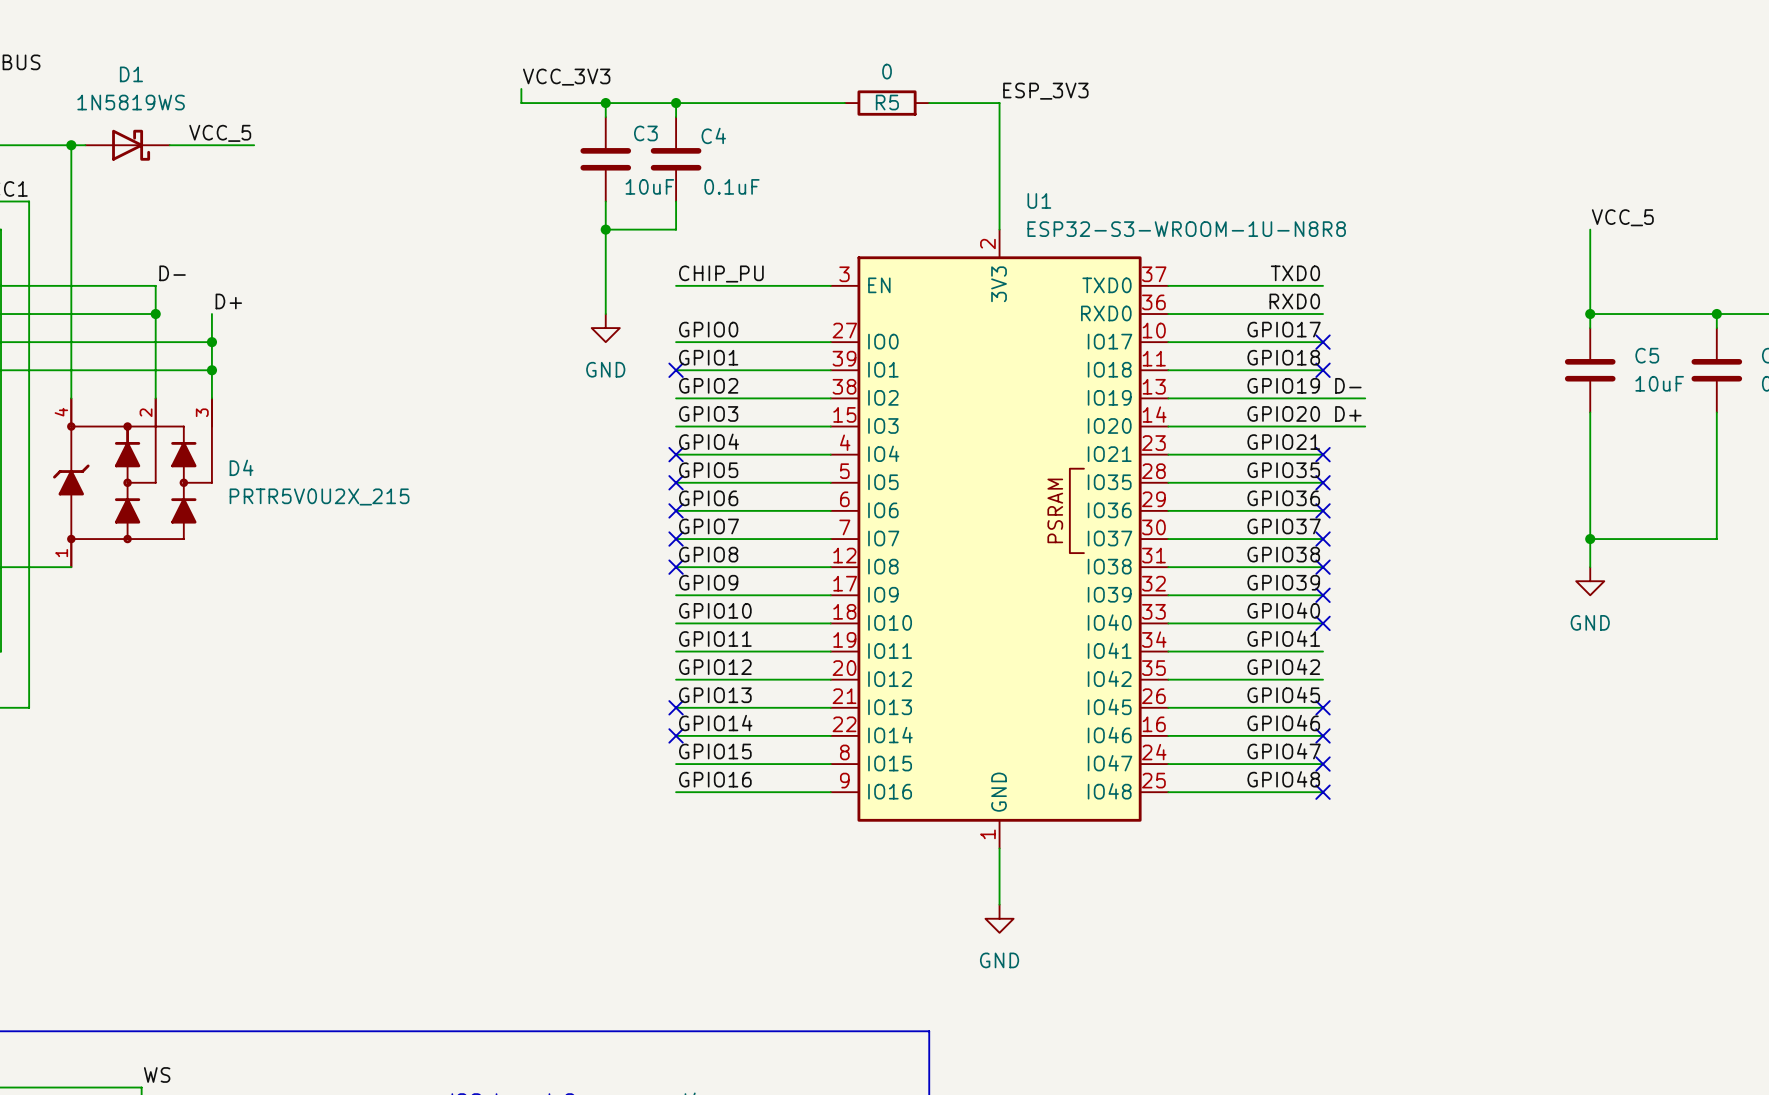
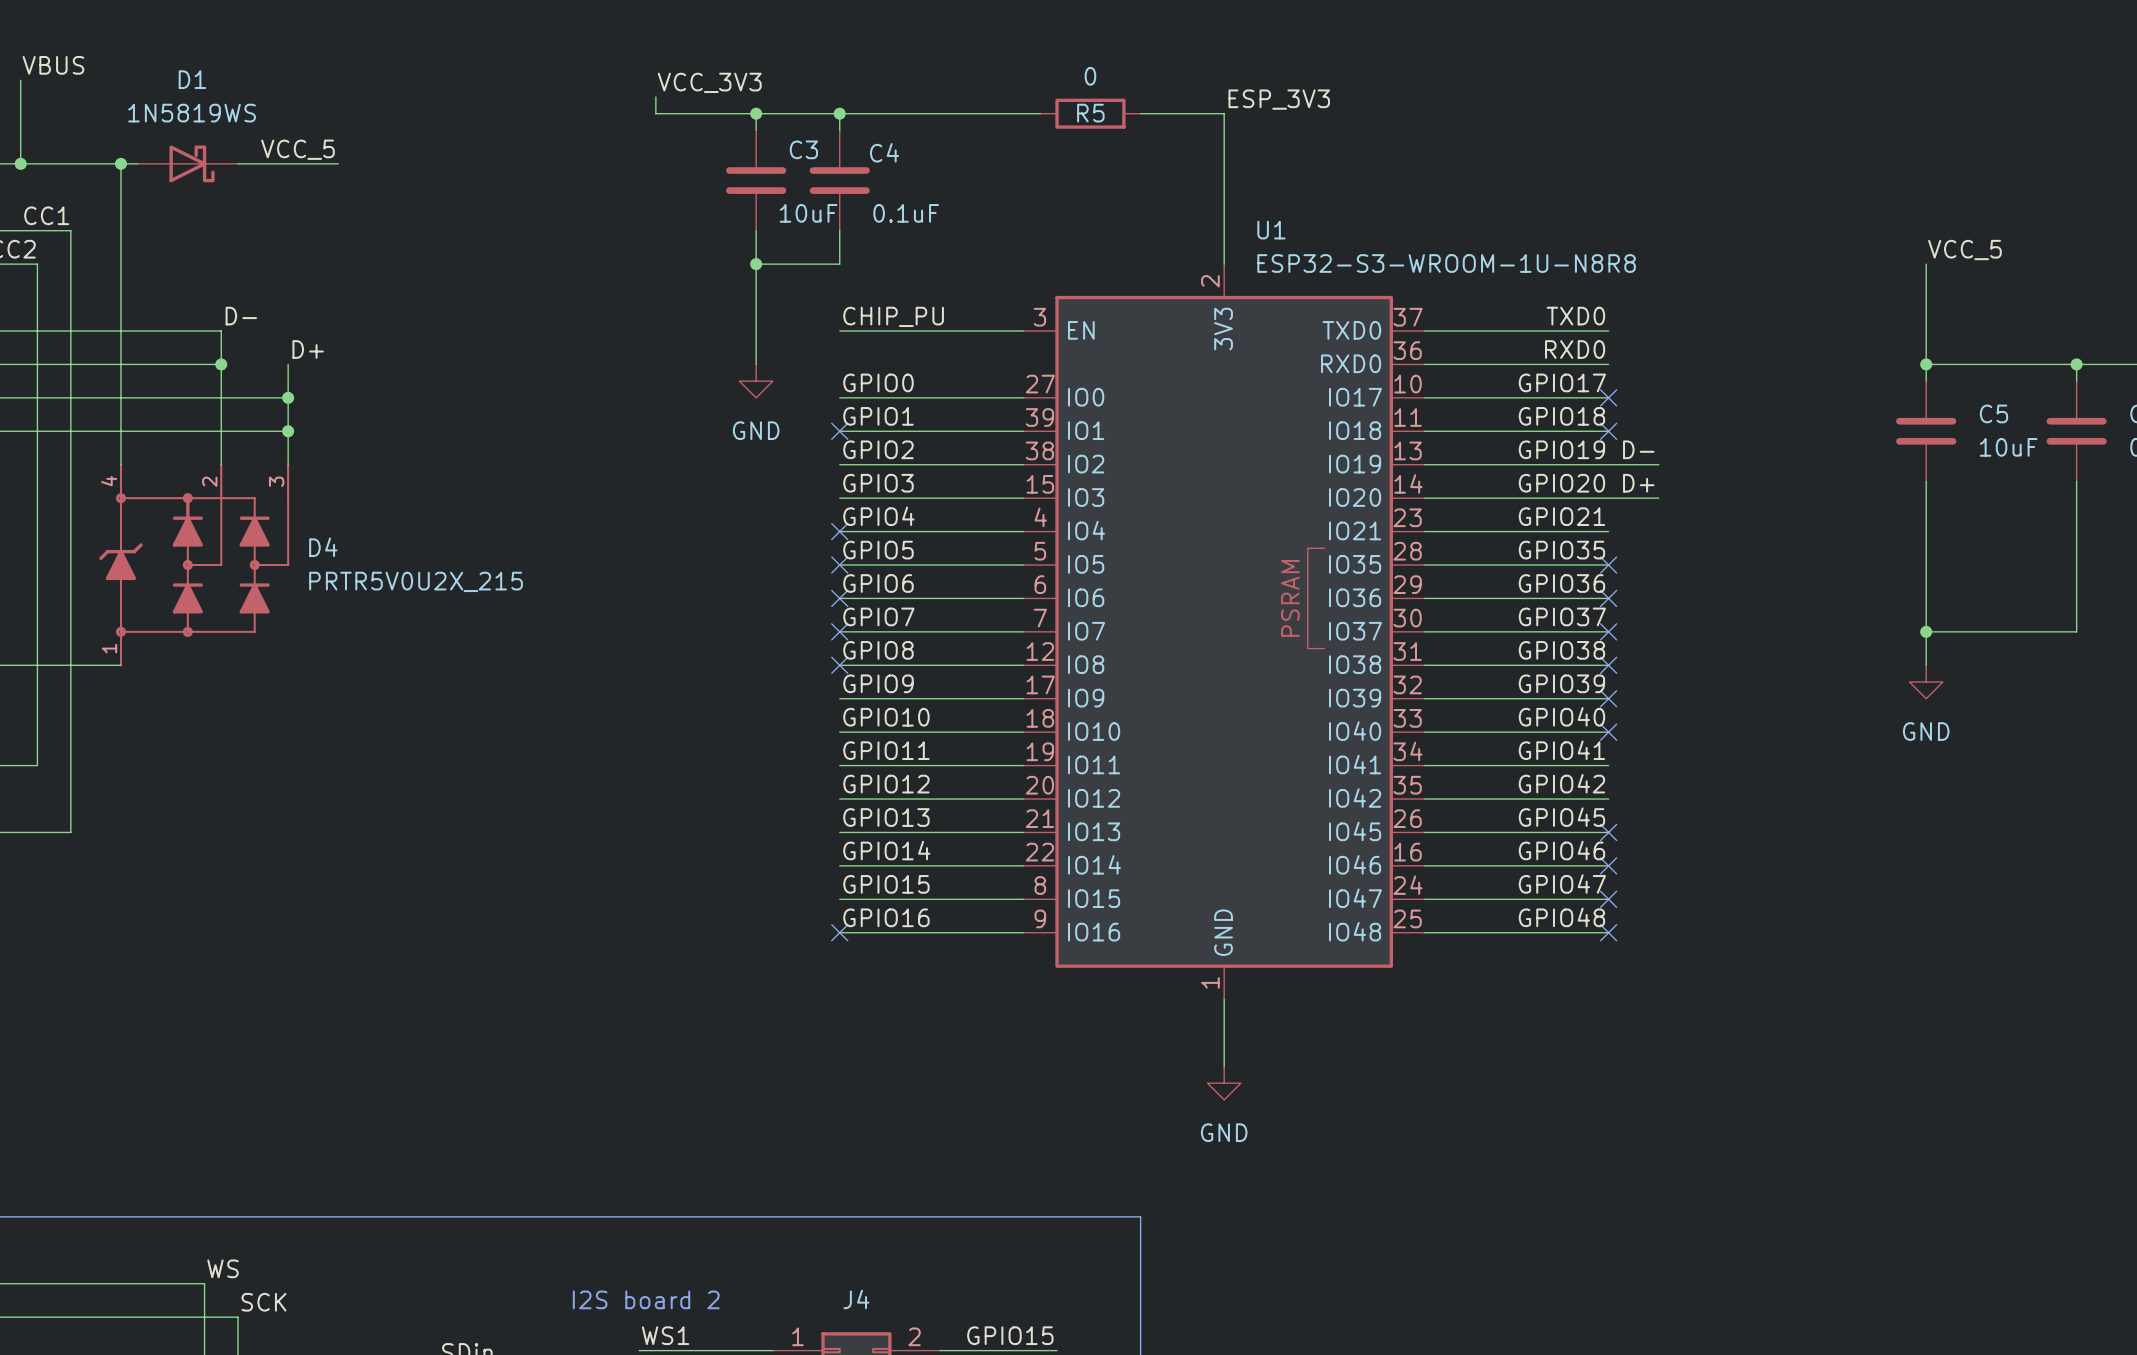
no-connect mark: (1323, 454) -> none
no-connect mark: (676, 707) -> none
no-connect mark: (676, 735) -> none
no-connect mark: none -> (839, 932)

